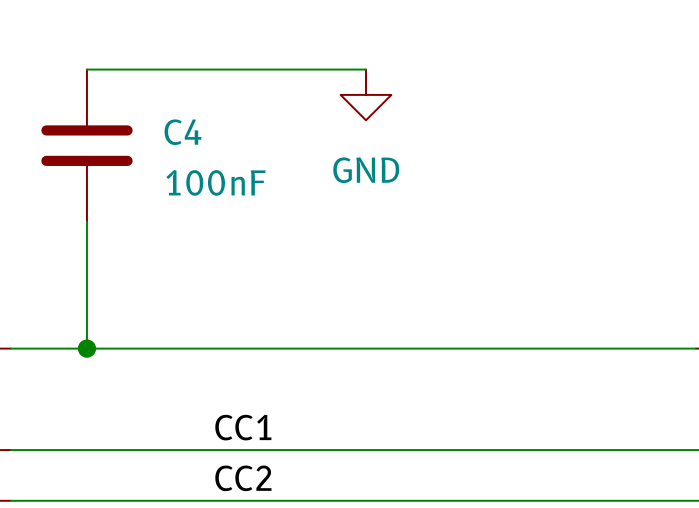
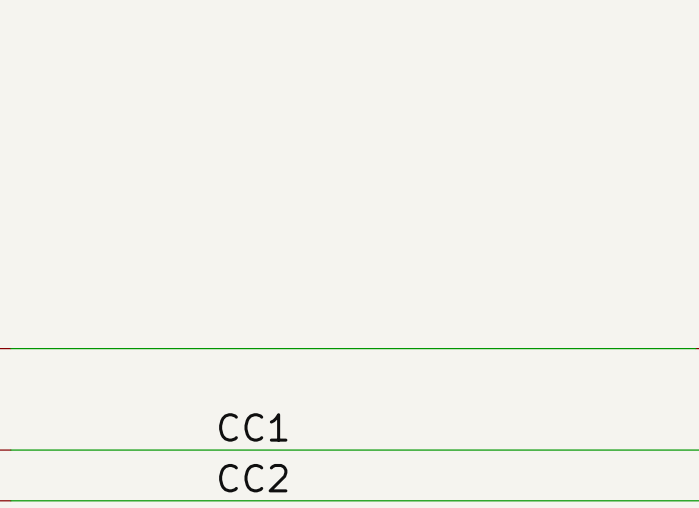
wire: (86, 69) (366, 69) -> none
power symbol: GND (366, 94) -> none
C4: 100nF (86, 145) -> none
wire: (86, 221) (86, 348) -> none
junction: (86, 348) -> none

